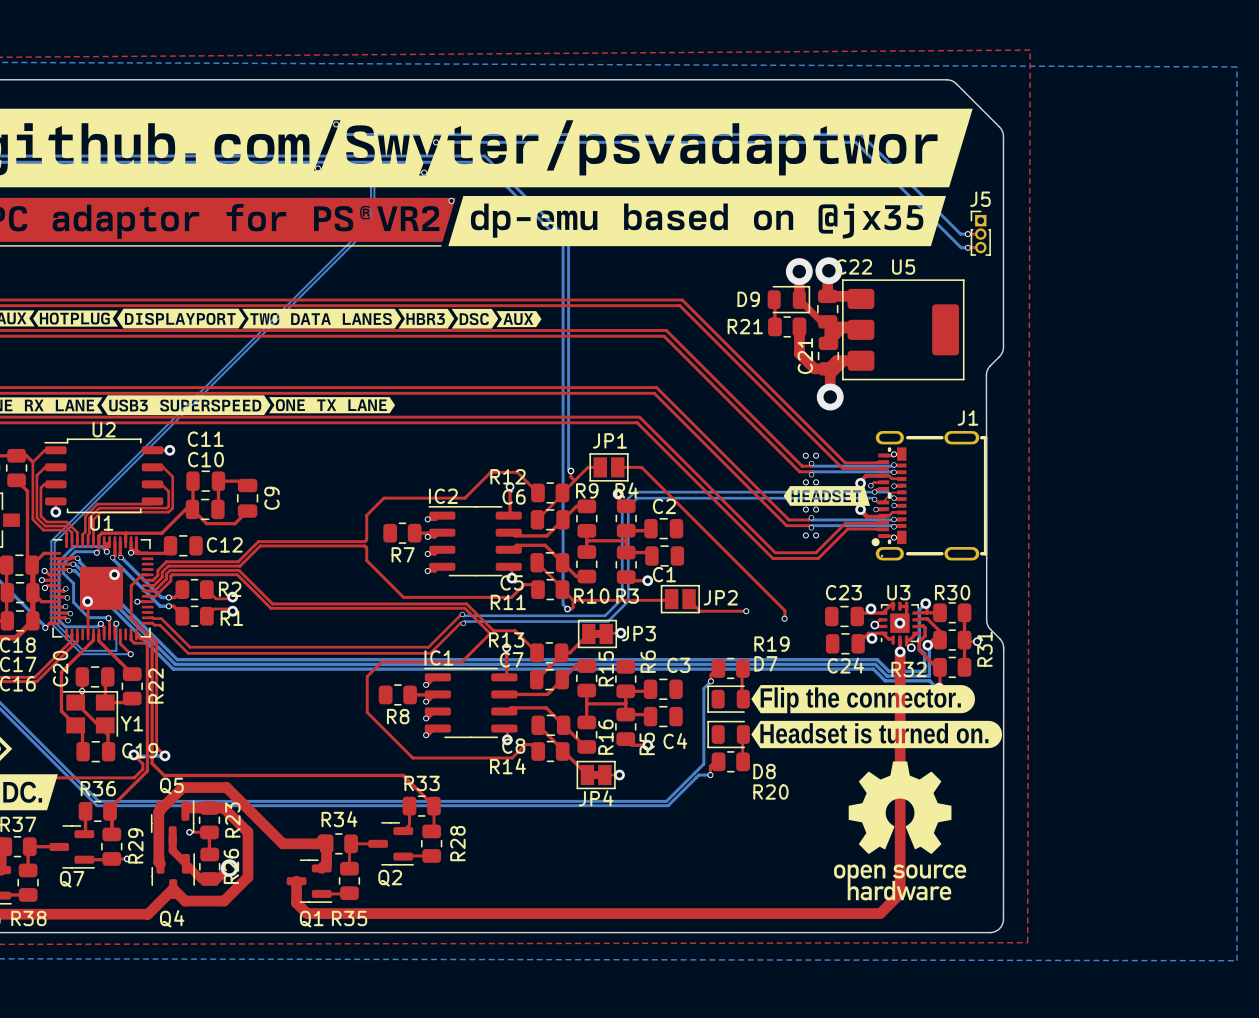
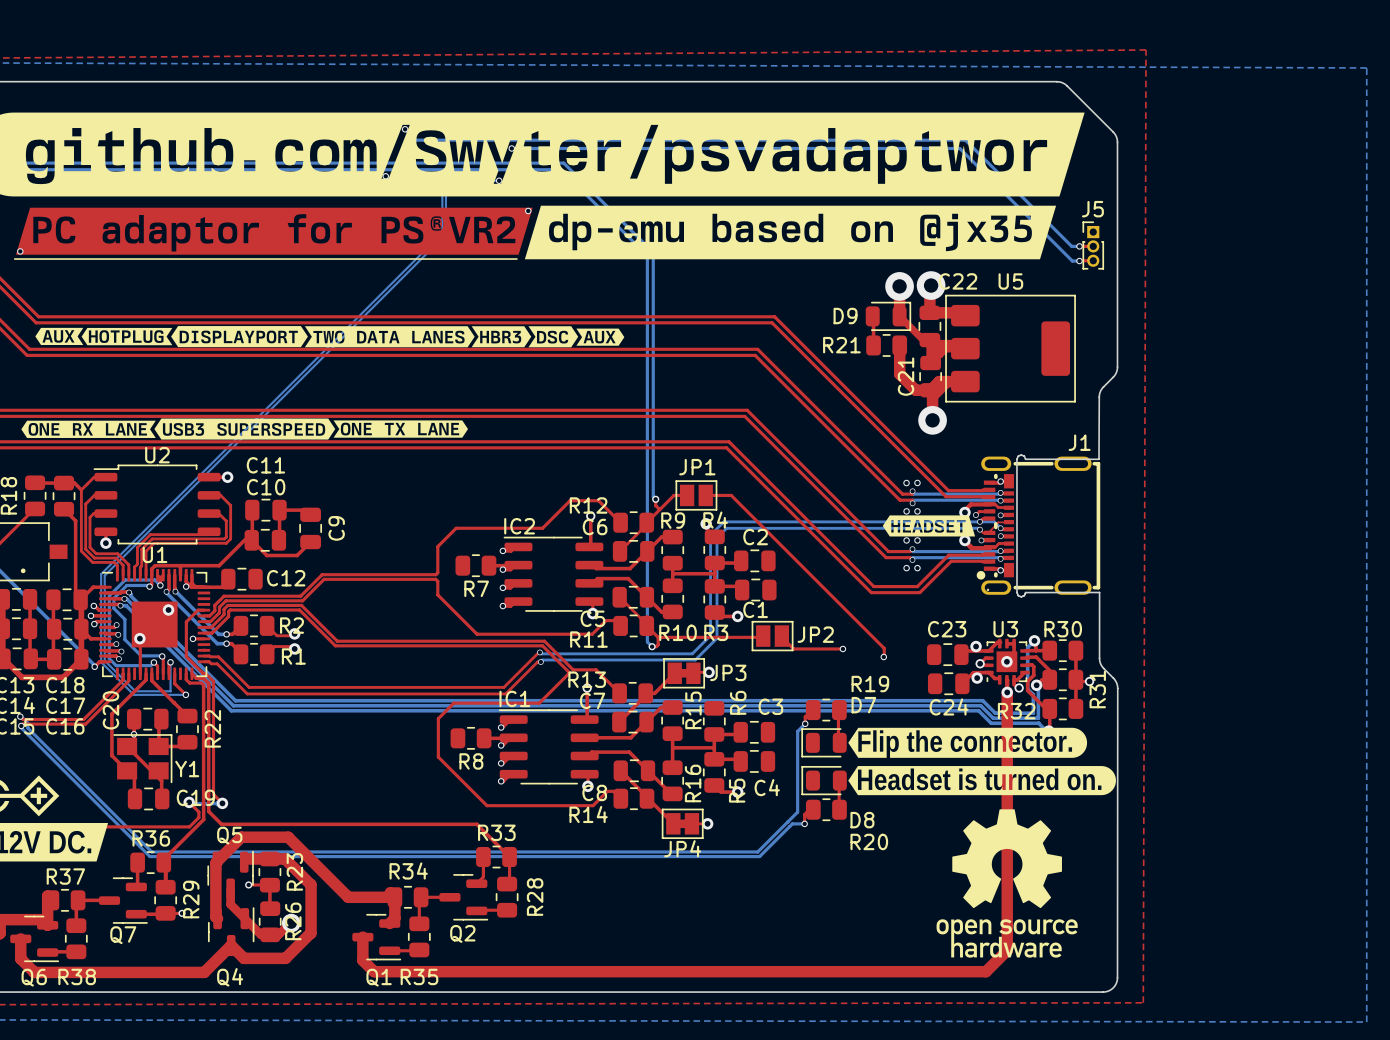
board edge: (986, 375) (986, 558) -> (1099, 397) (1098, 459) (1025, 459) (1021, 454) (1016, 459) (1017, 592) (1021, 596) (1025, 592) (1099, 592)

